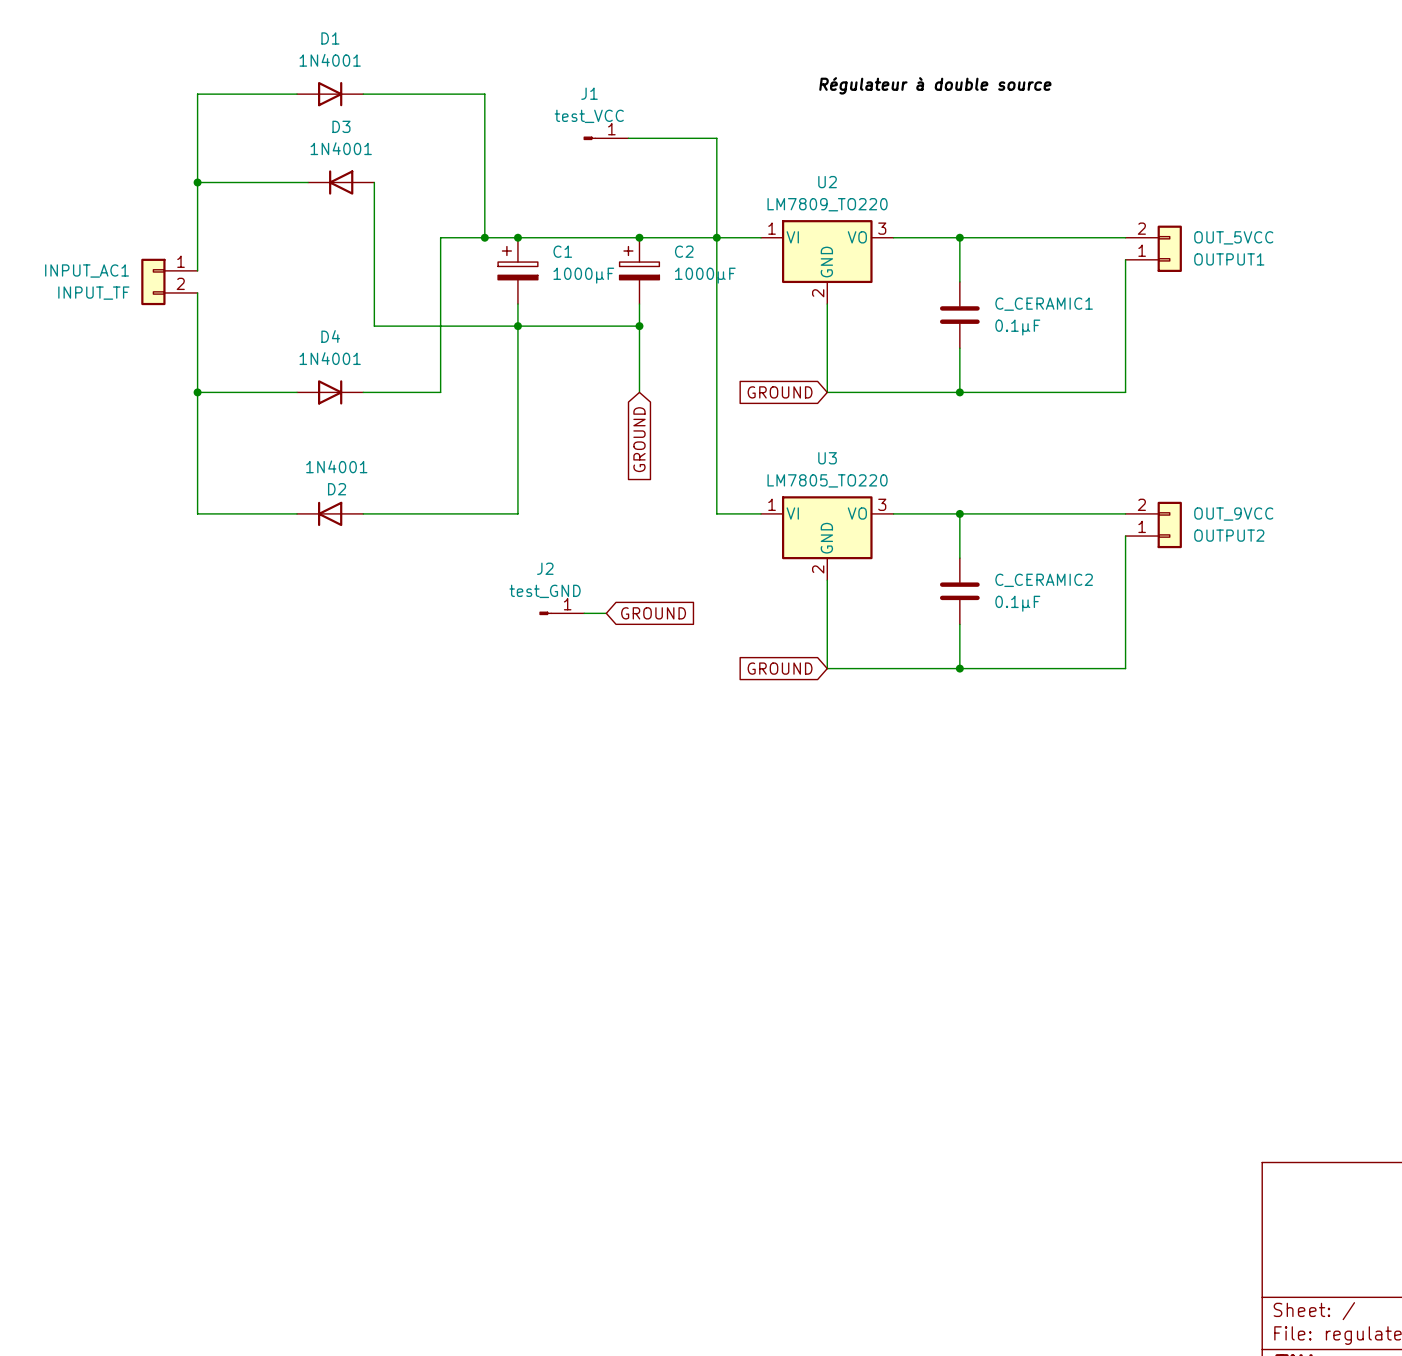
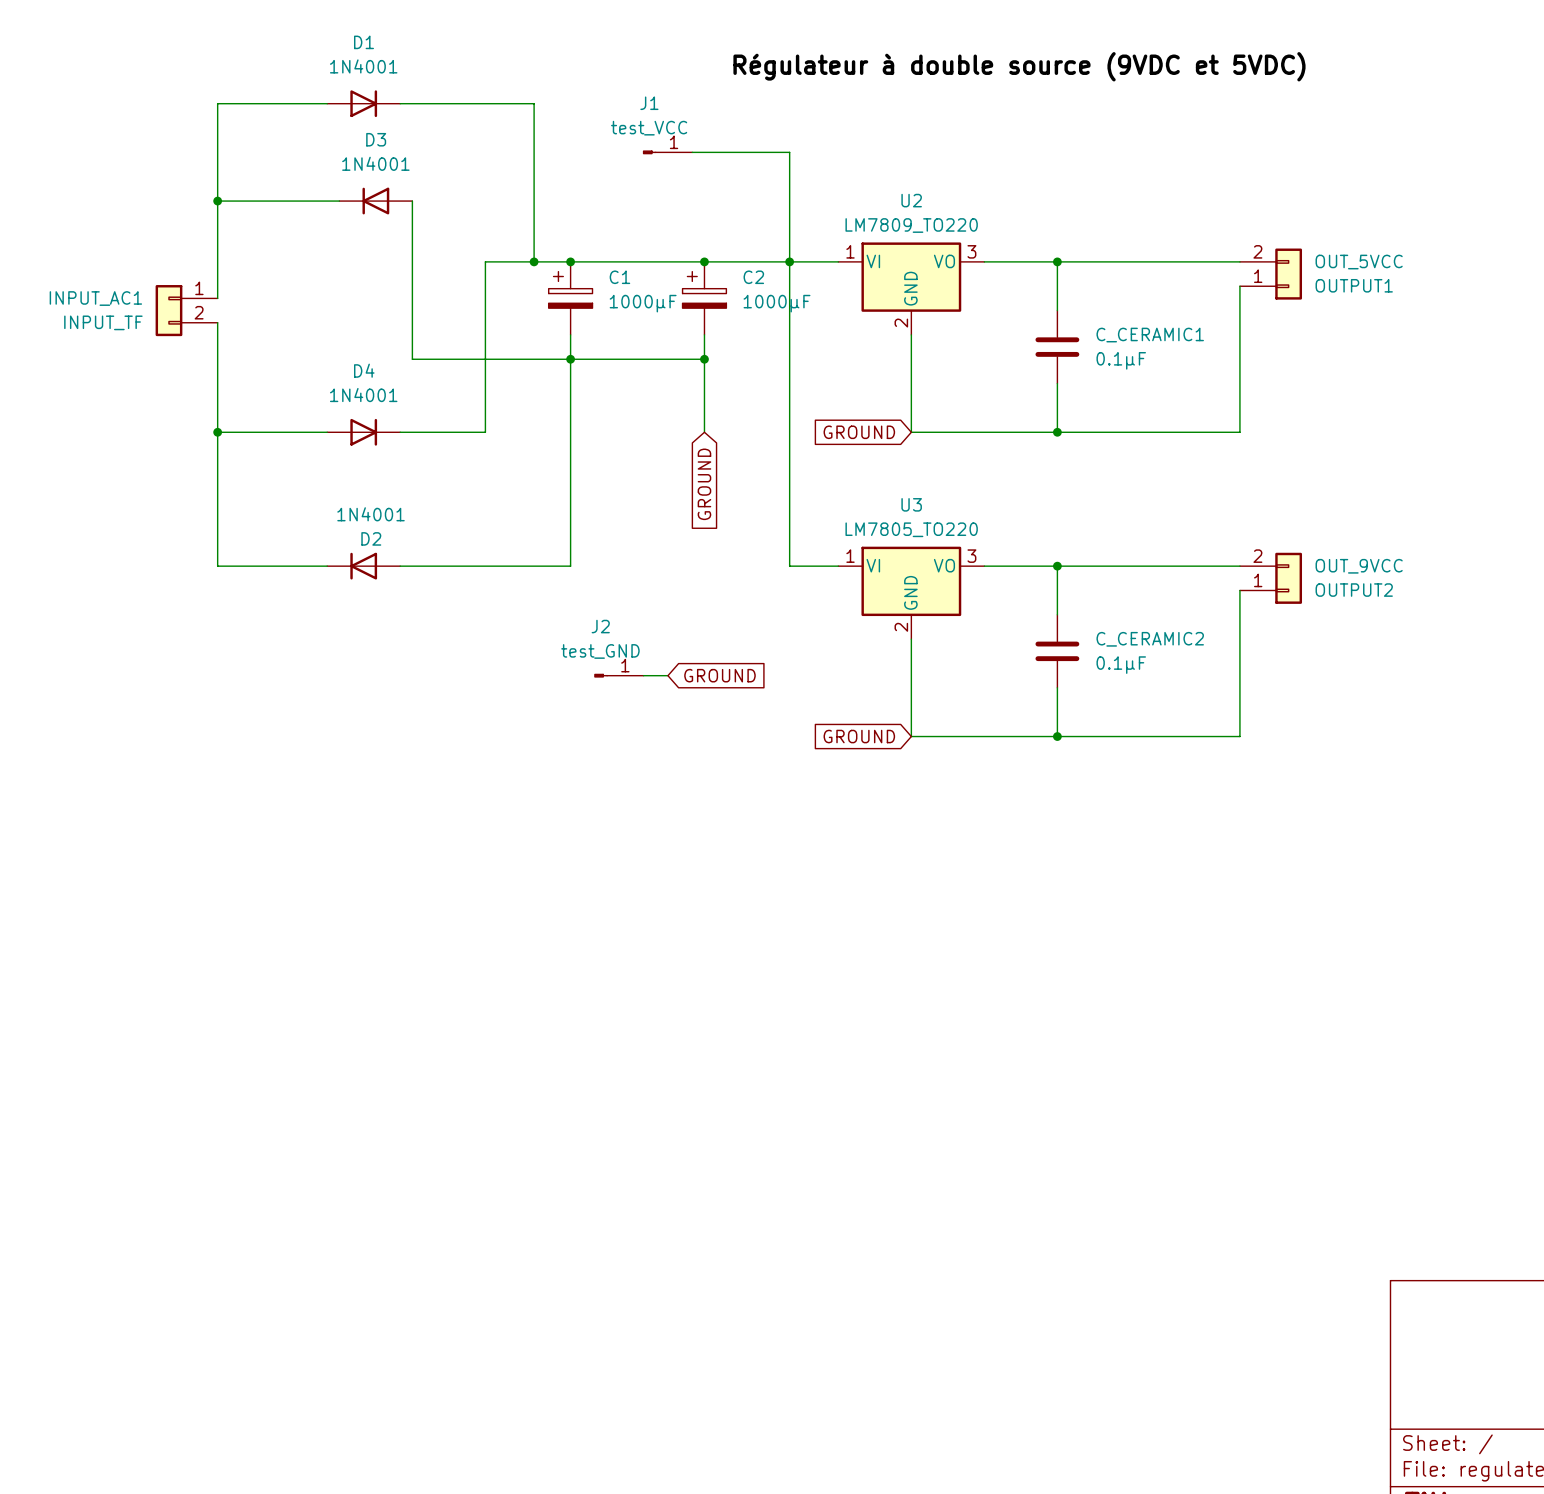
label: Régulateur à double source (935, 85) -> Régulateur à double source (9VDC et 5VDC) (1019, 66)

